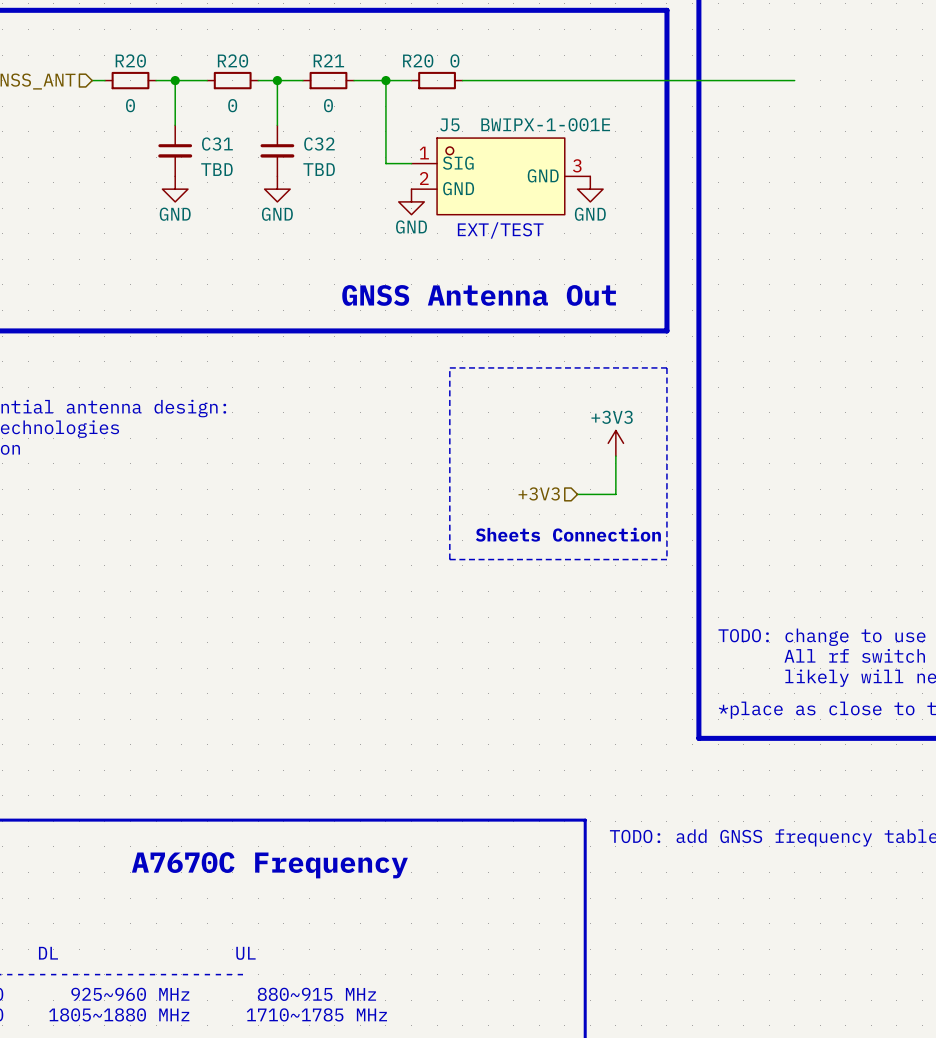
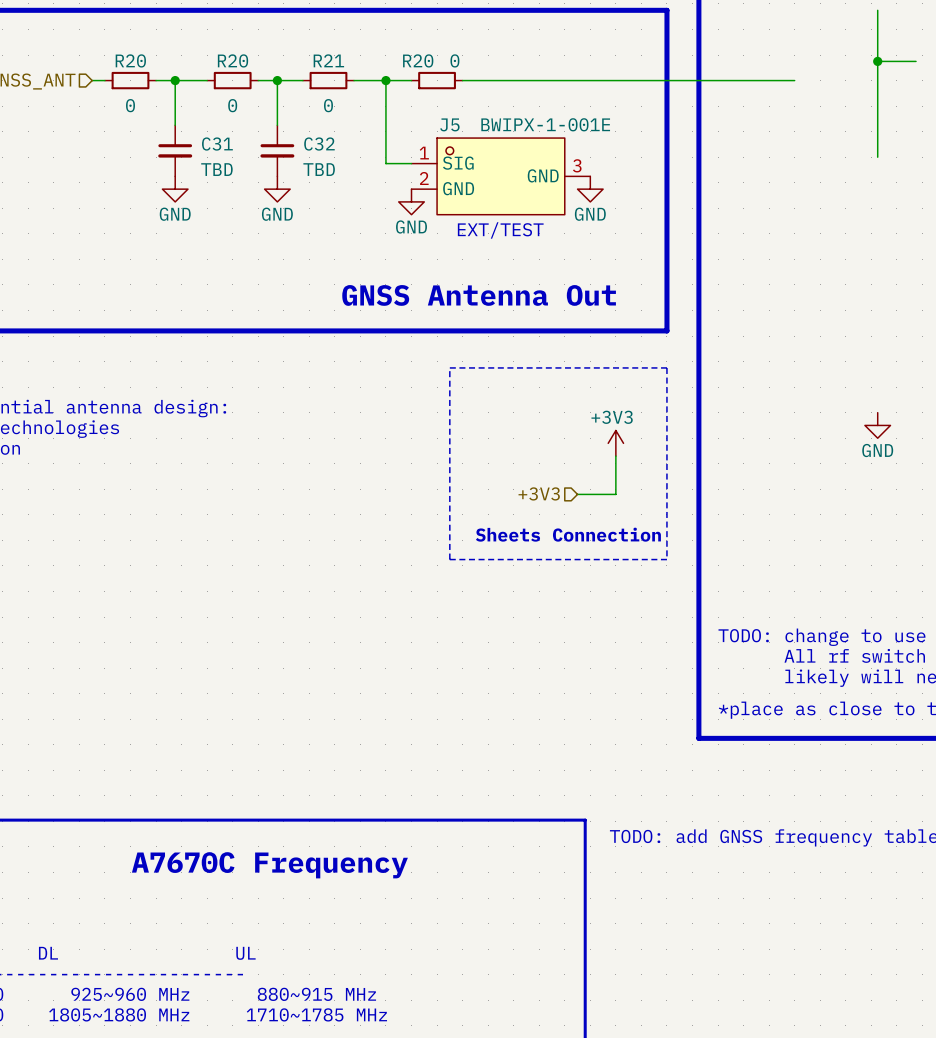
wire: none -> (877, 10) (877, 157)
wire: none -> (877, 61) (916, 61)
junction: none -> (877, 61)
power symbol: none -> GND (877, 425)

